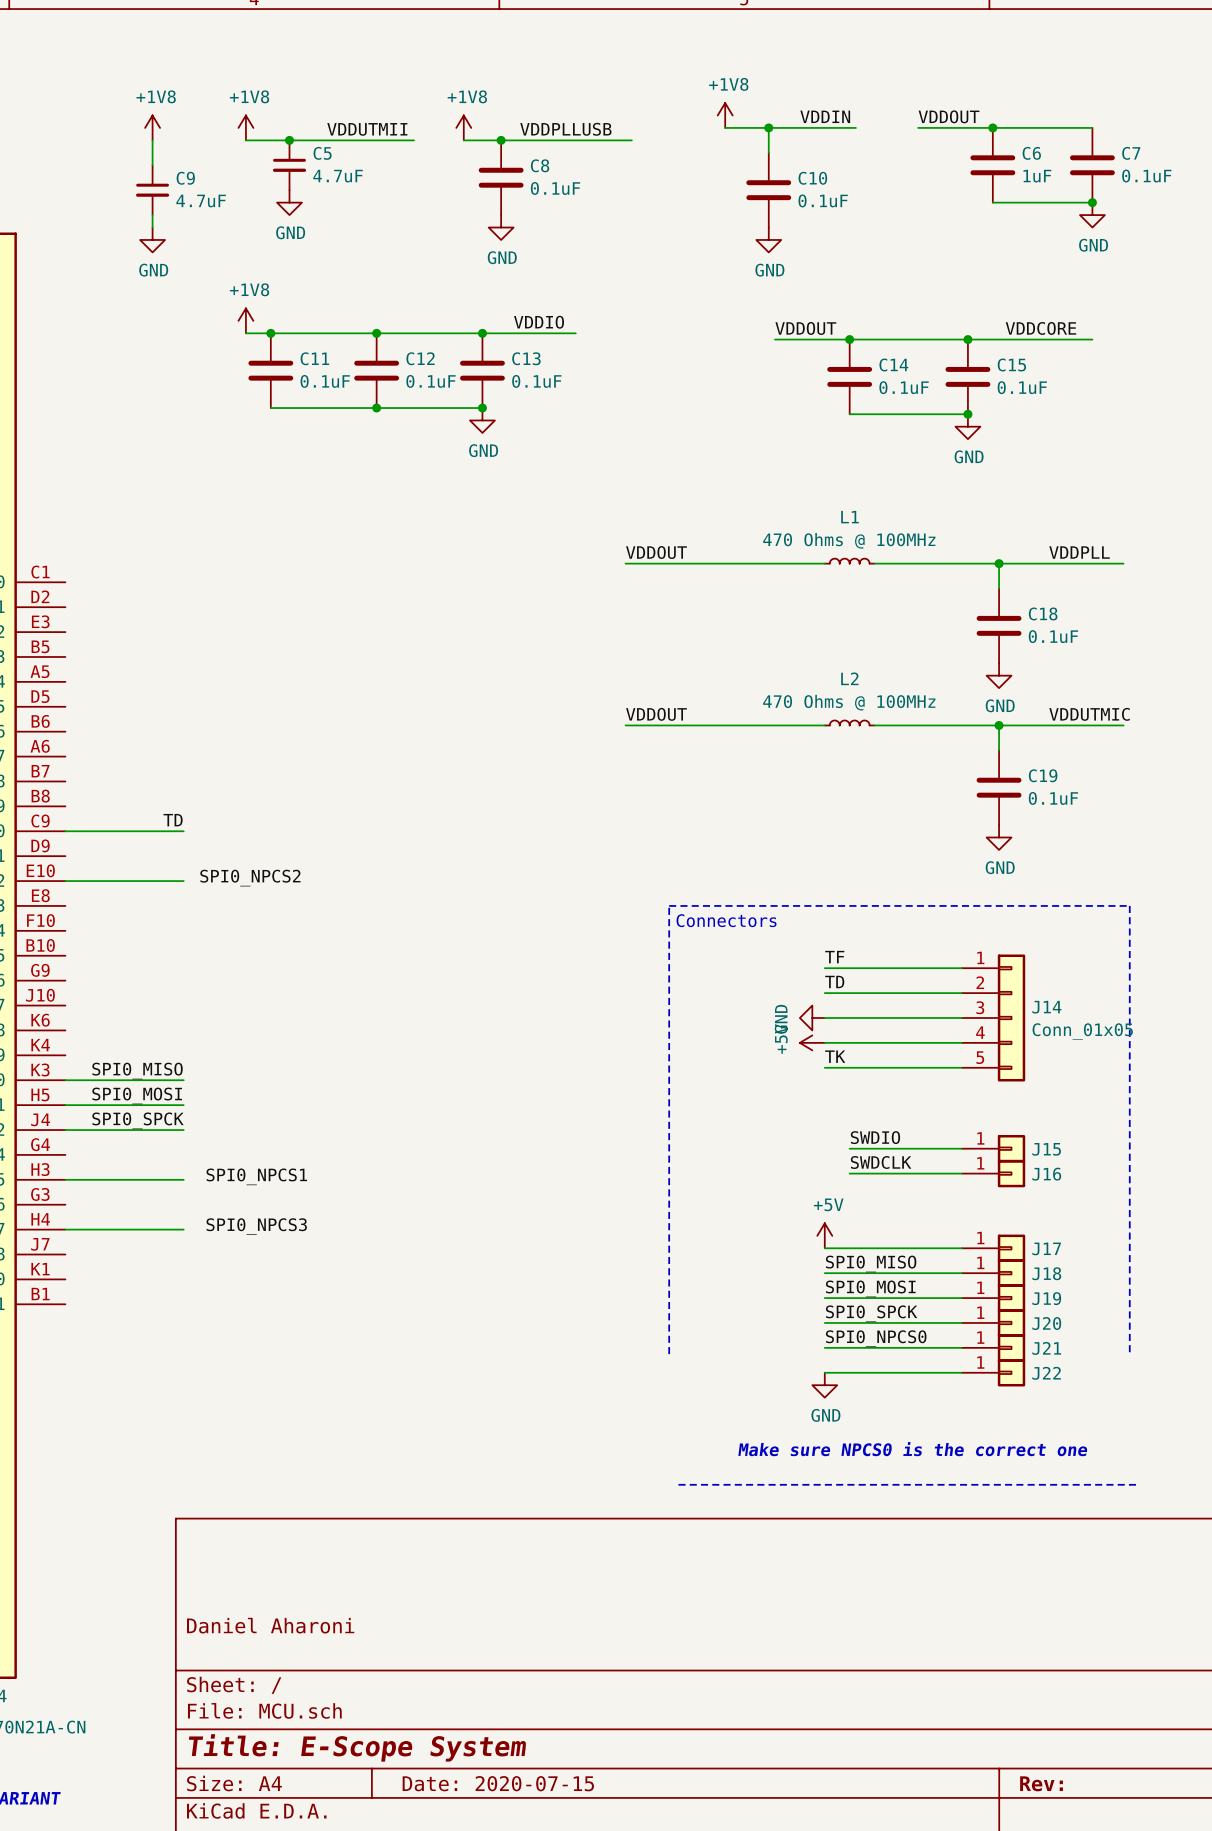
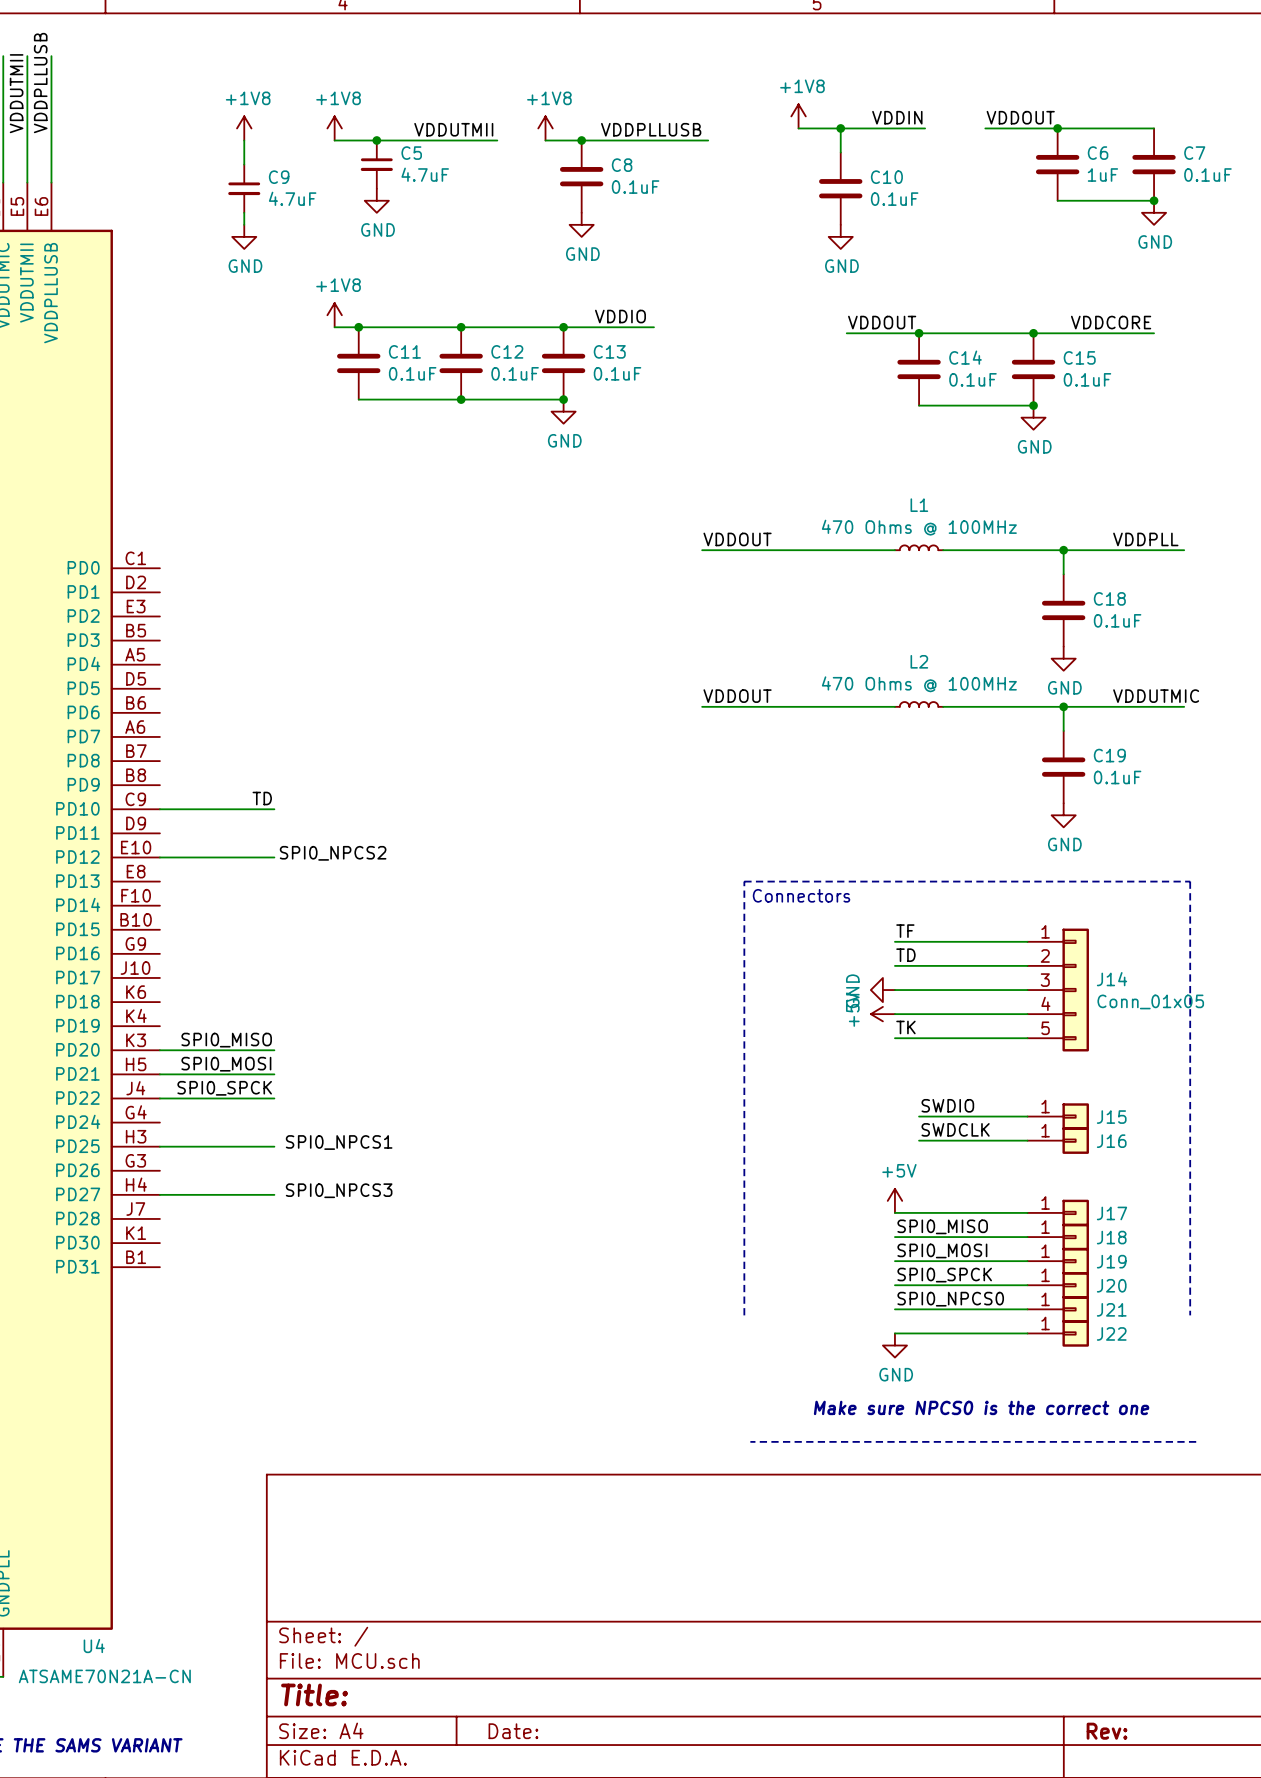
title block: Daniel Aharoni (270, 1625) -> none
title block: Title: E-Scope System (357, 1747) -> Title: (314, 1694)
title block: Date: 2020-07-15 (498, 1783) -> Date: (513, 1731)

